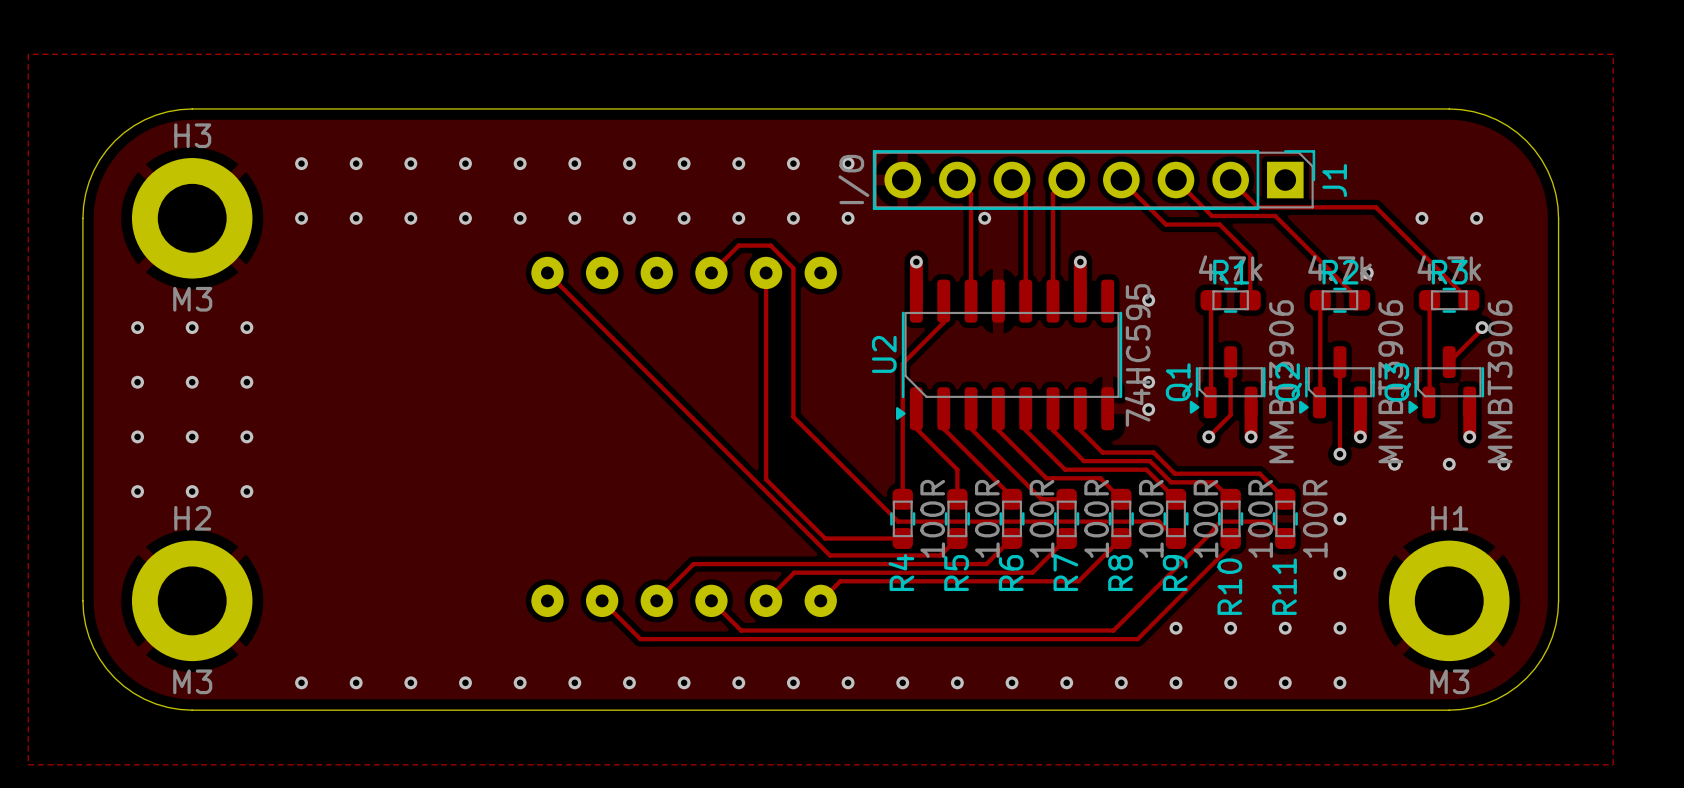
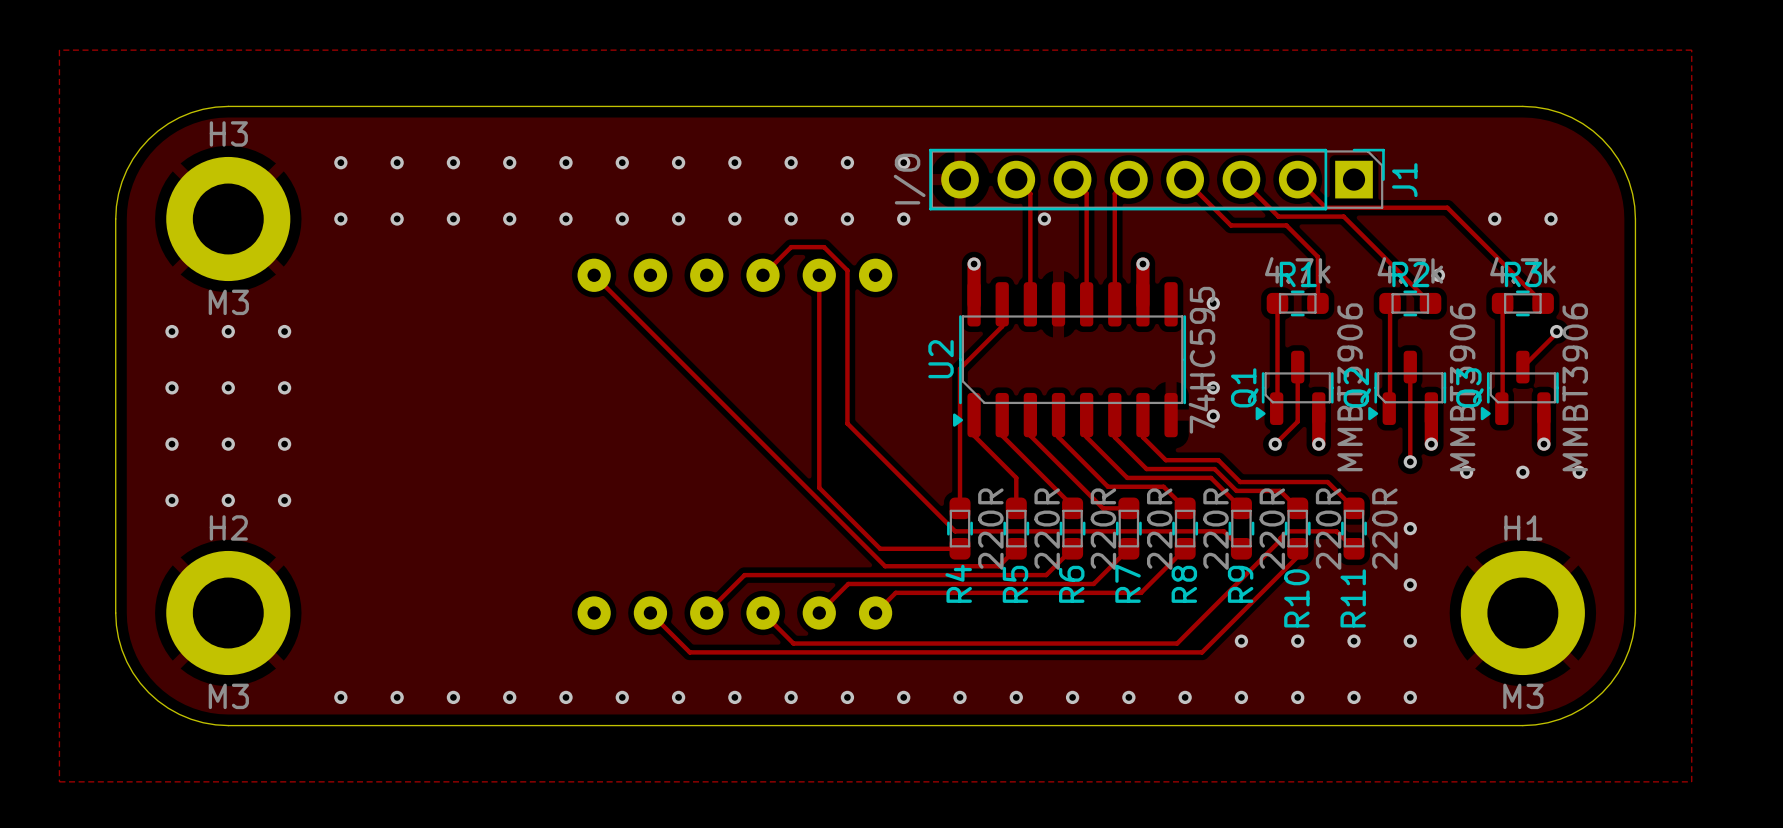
R4 value: 100R (932, 518) -> 220R (990, 529)
R5 value: 100R (987, 518) -> 220R (1047, 529)
R6 value: 100R (1042, 518) -> 220R (1103, 529)
R7 value: 100R (1096, 518) -> 220R (1159, 529)
R8 value: 100R (1151, 518) -> 220R (1216, 529)
R9 value: 100R (1205, 518) -> 220R (1272, 529)
R10 value: 100R (1260, 518) -> 220R (1328, 529)
R11 value: 100R (1315, 518) -> 220R (1384, 529)

